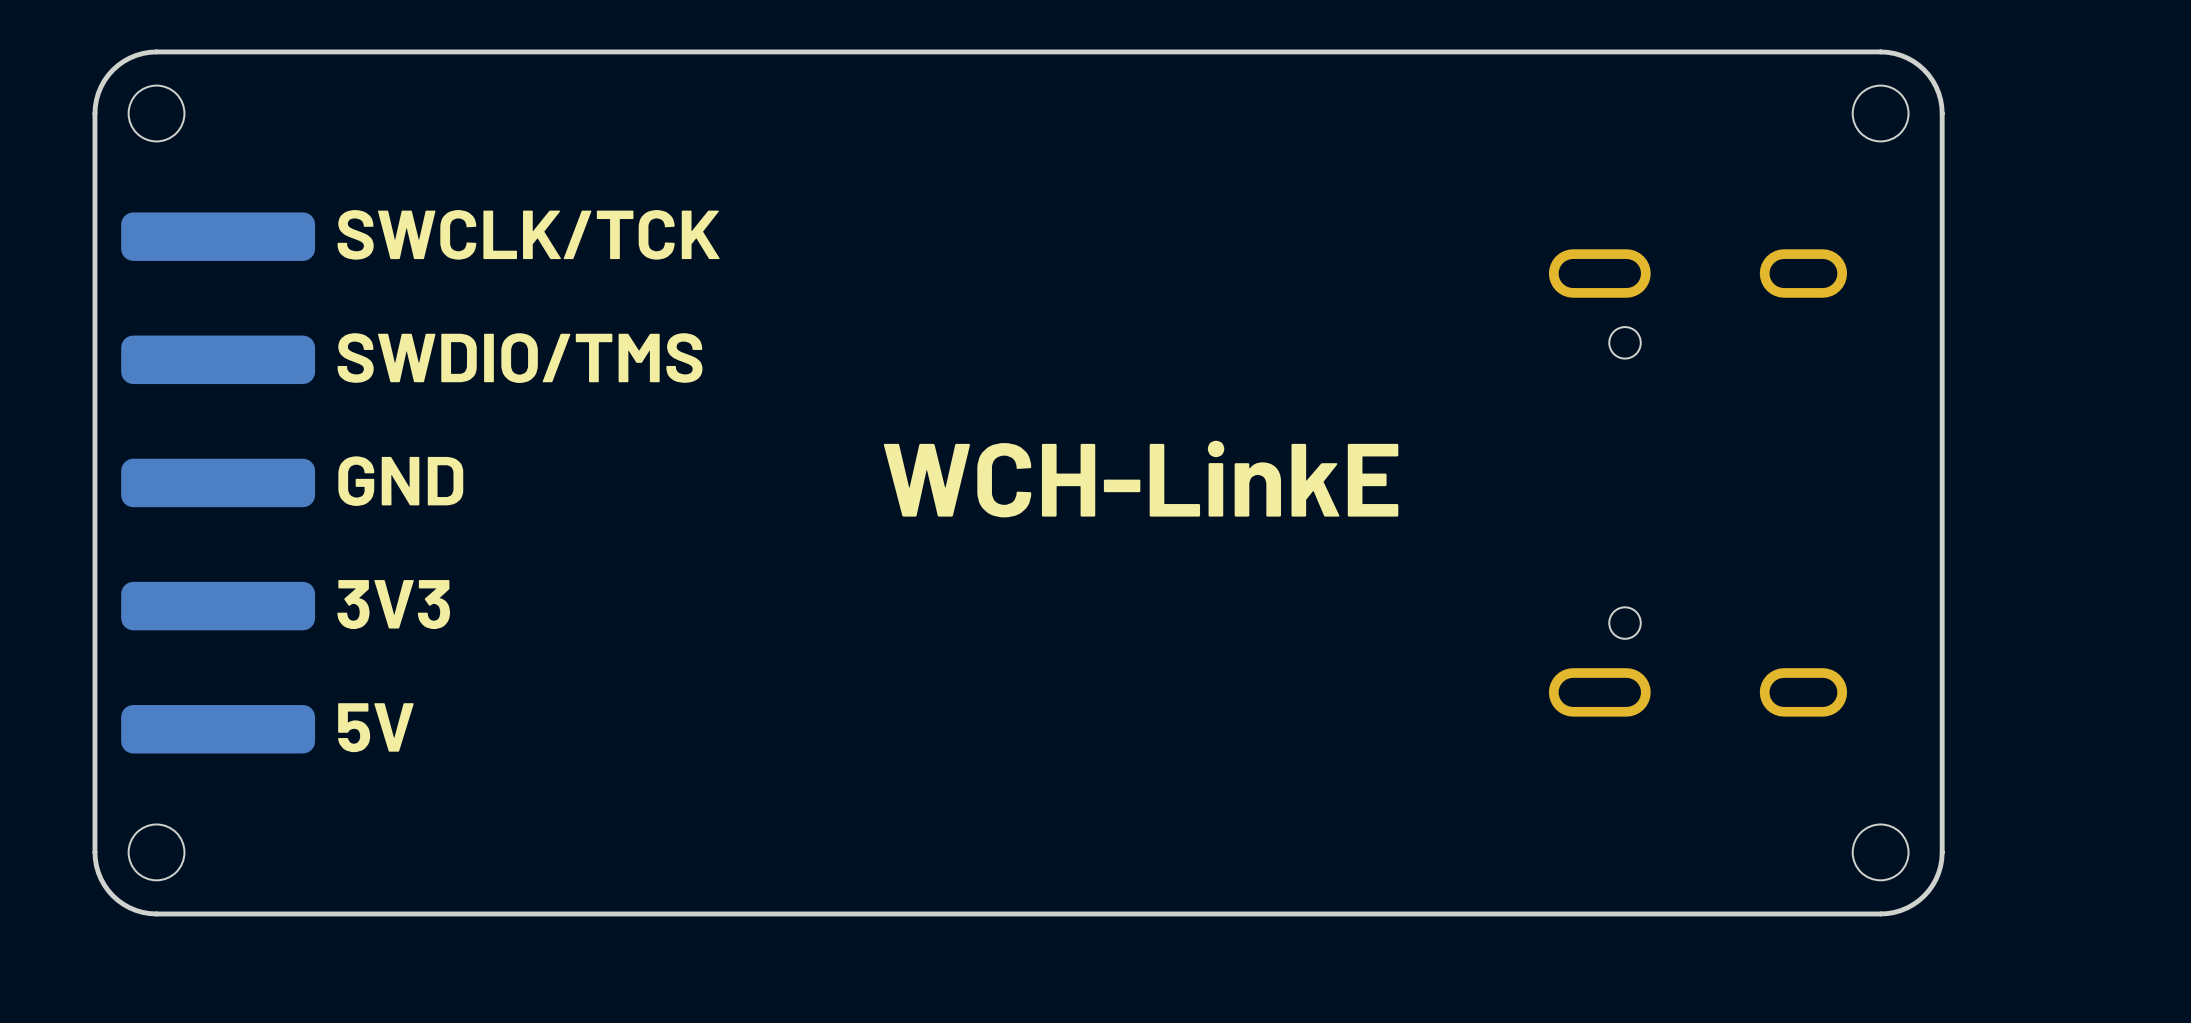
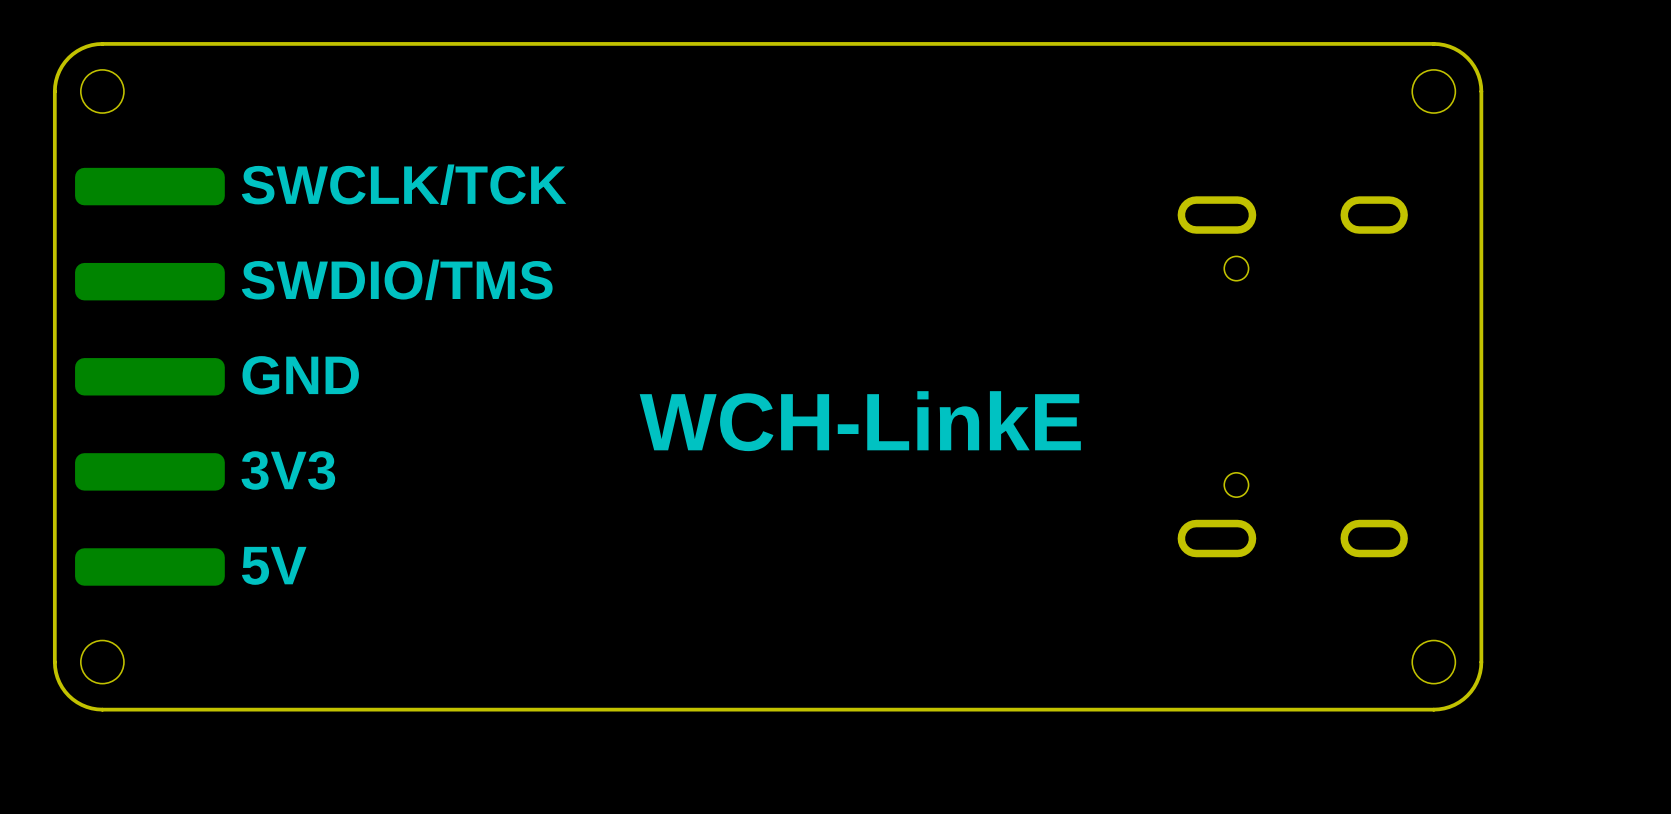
text position: WCH-LinkE (1141, 479) -> WCH-LinkE (860, 421)

